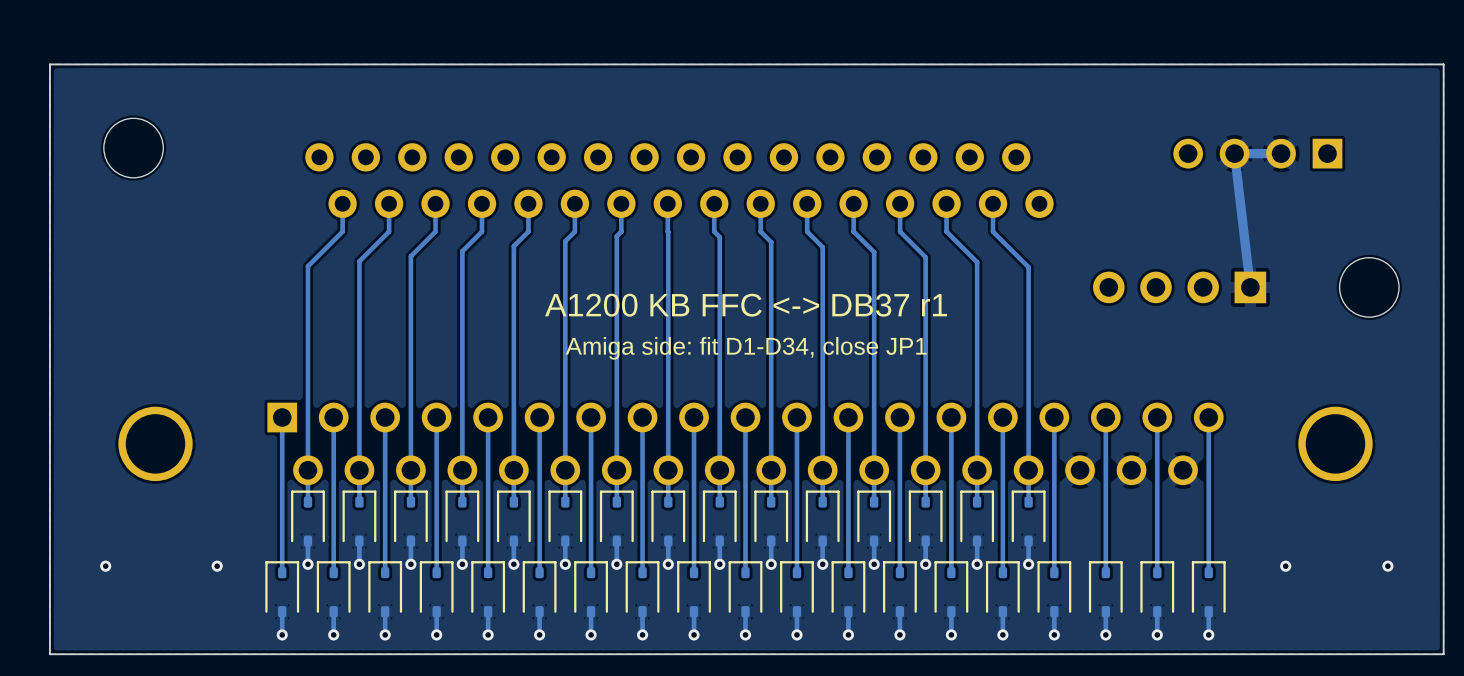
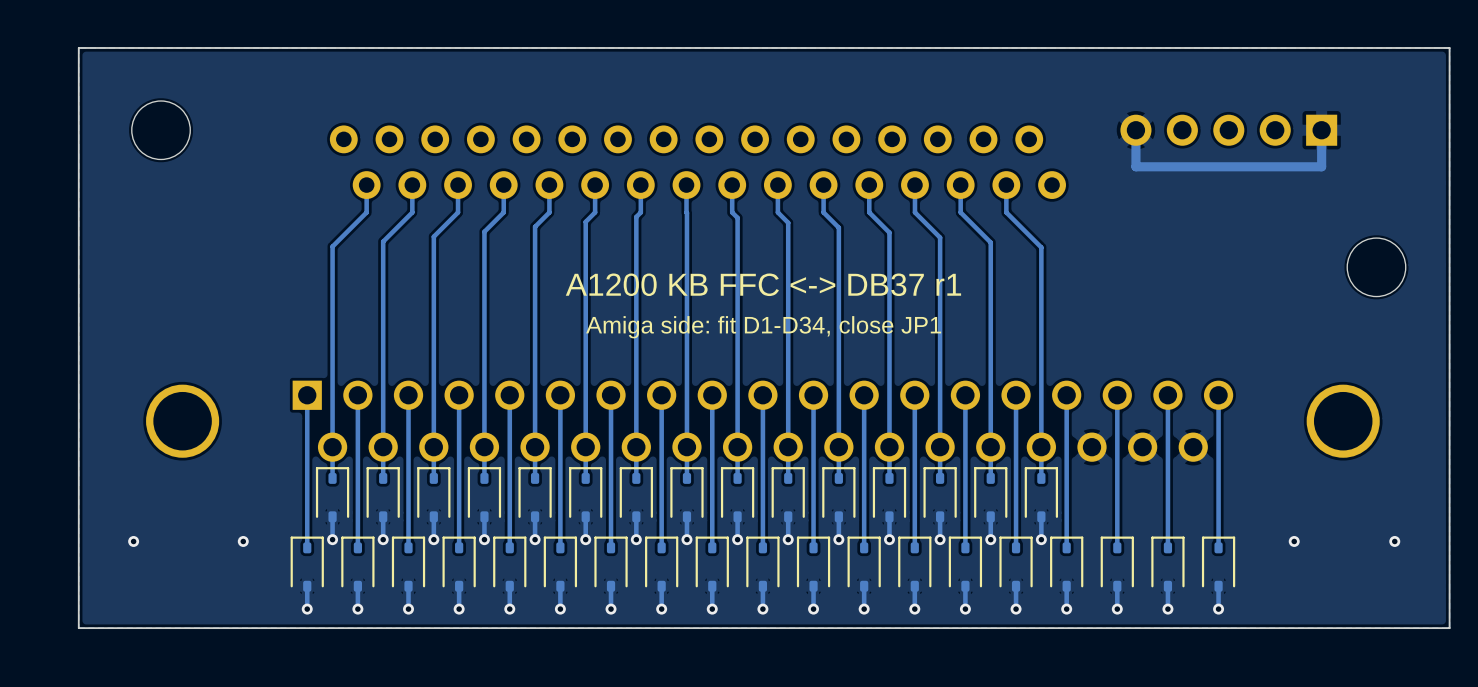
part: none -> (1228, 130)
track: none -> (1321, 130) (1321, 166) (1135, 166) (1135, 130)
part: (1257, 153) -> none
track: (1281, 153) (1234, 153) (1250, 287) -> none
part: (1179, 287) -> none

